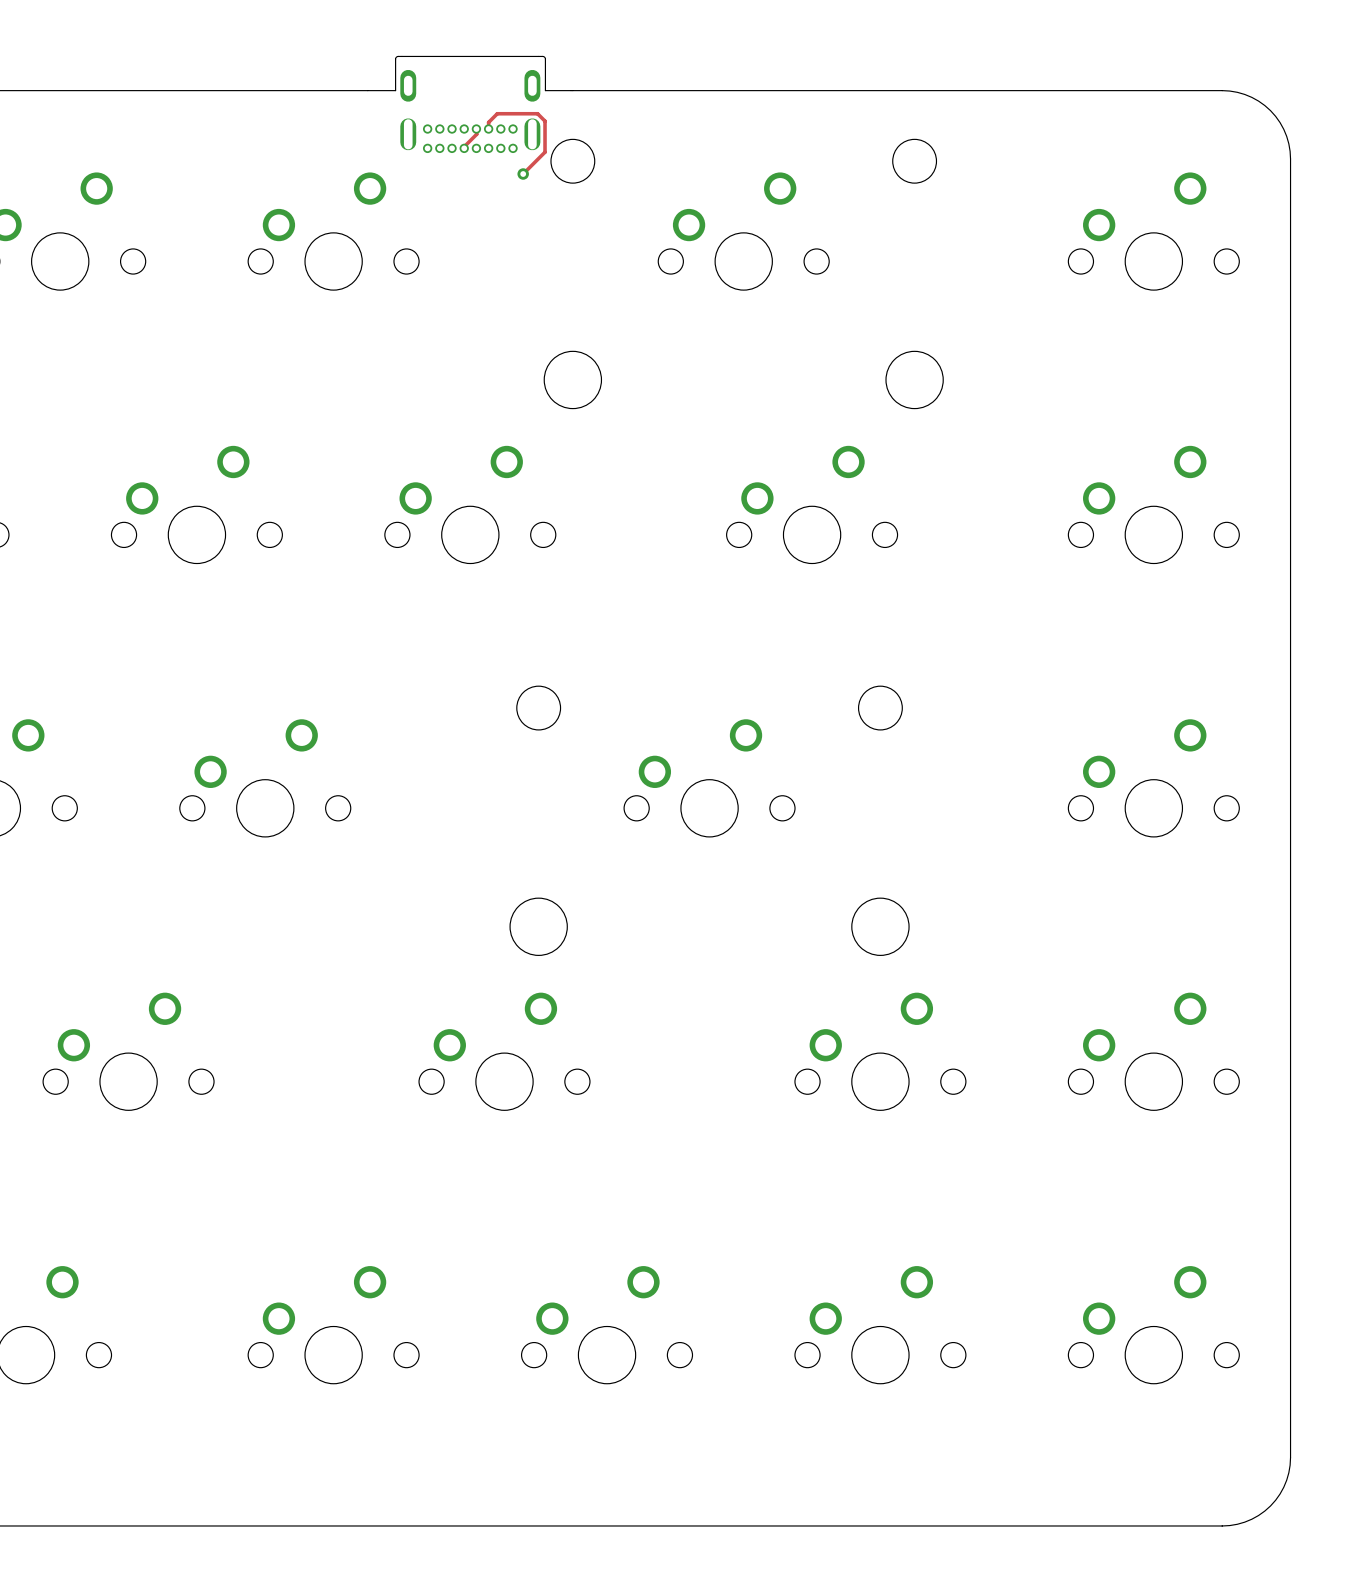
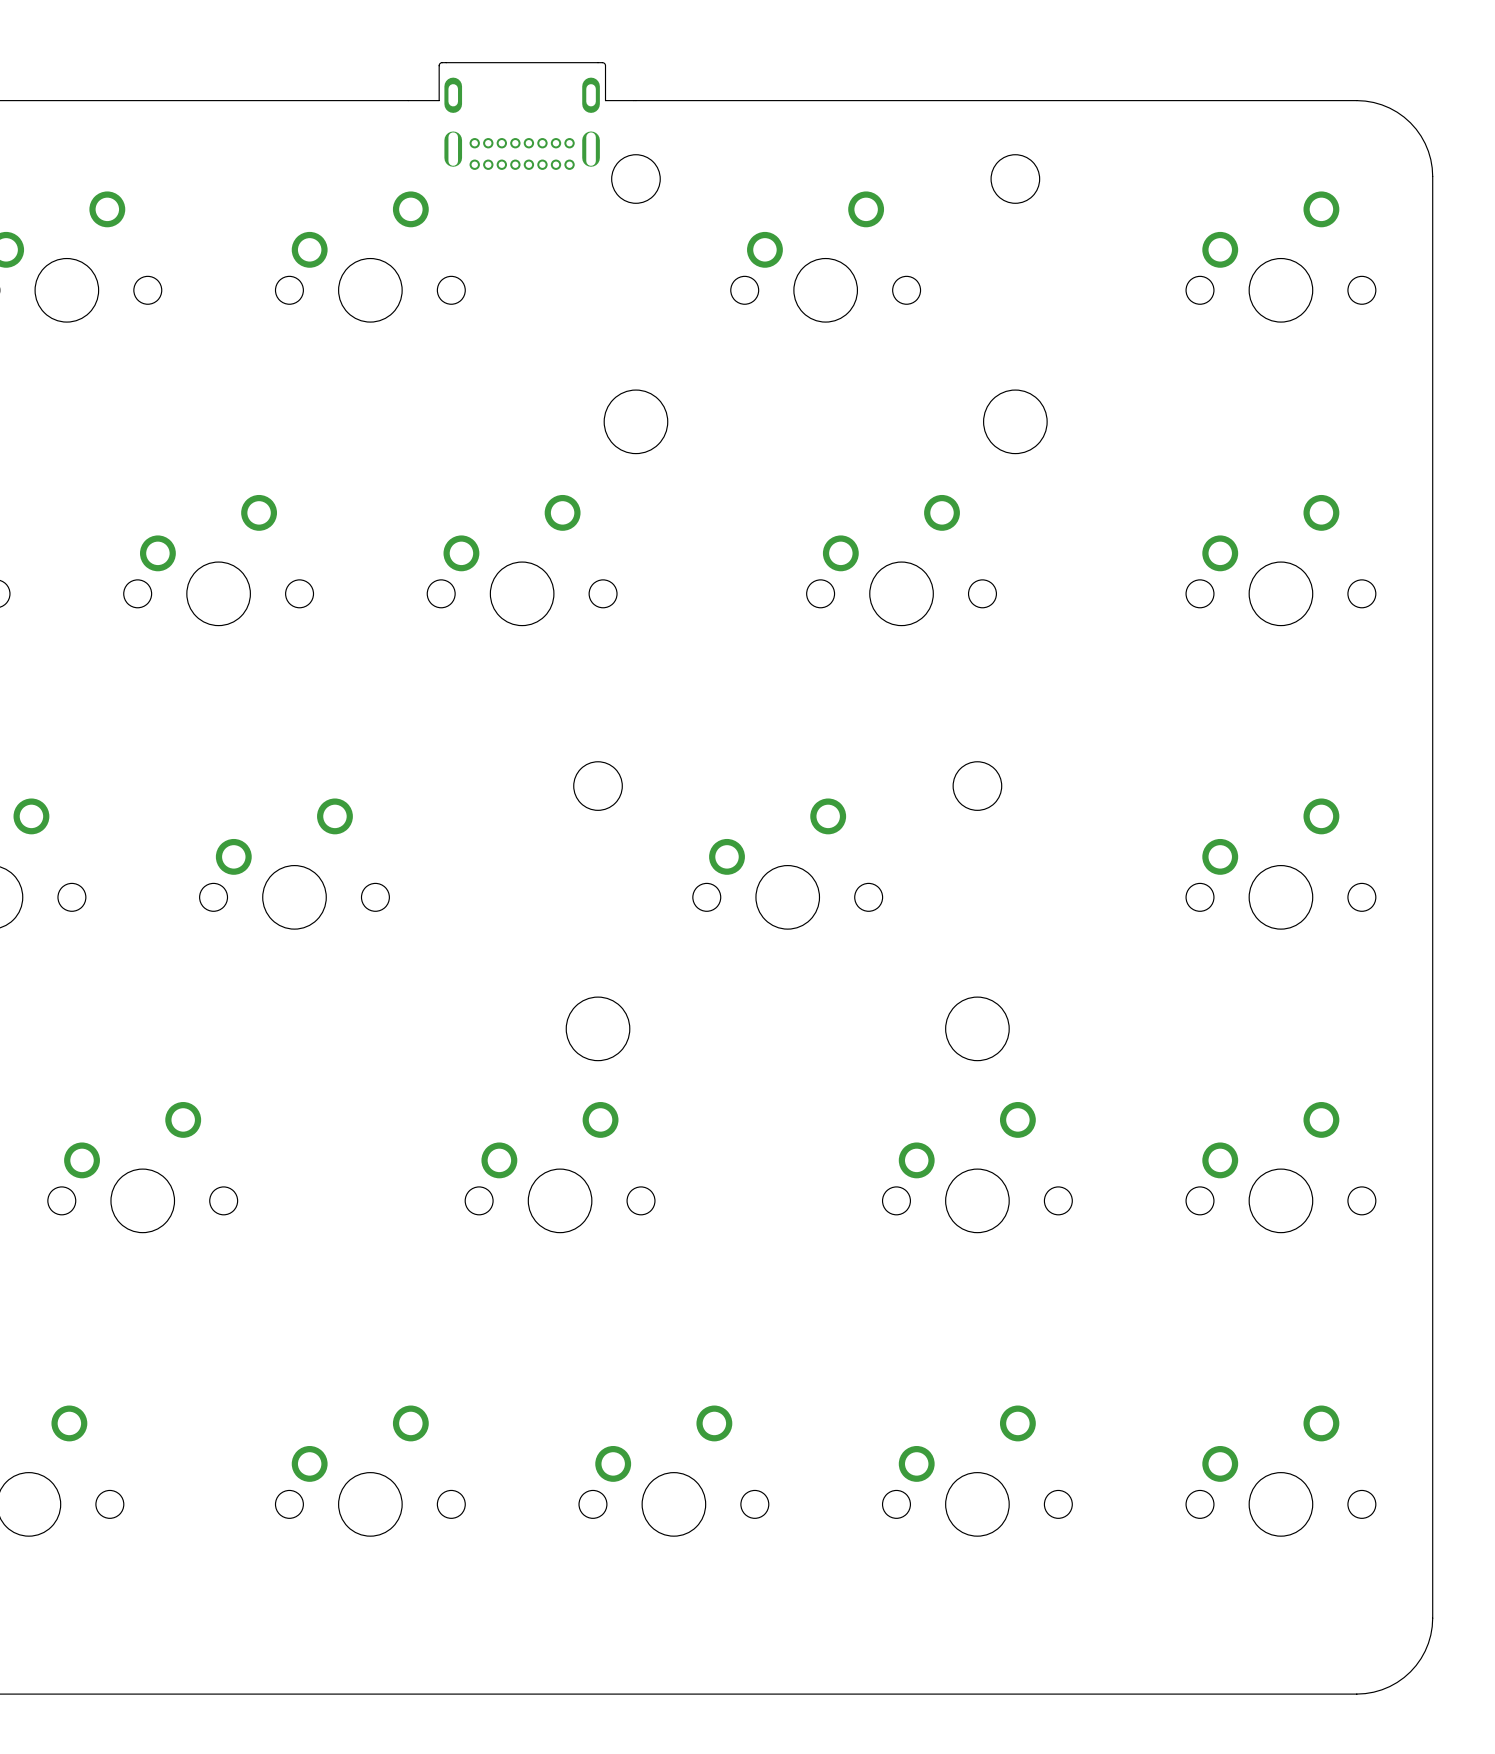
track: (476, 128) (476, 134) (464, 148) -> none
track: (488, 129) (488, 122) (497, 113) (537, 113) (545, 121) (545, 152) (523, 174) -> none
via: (523, 174) -> none

